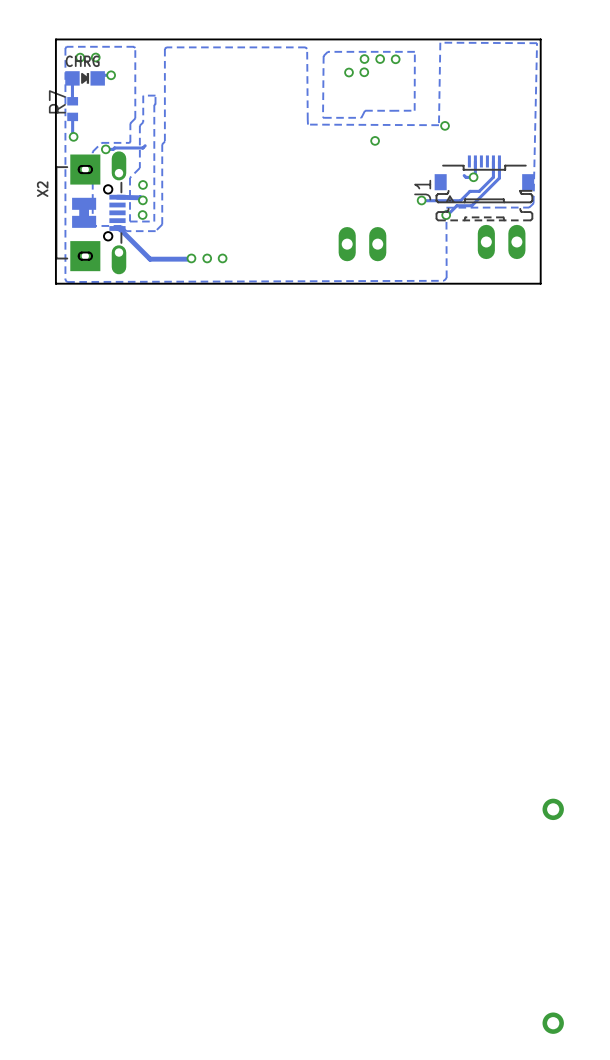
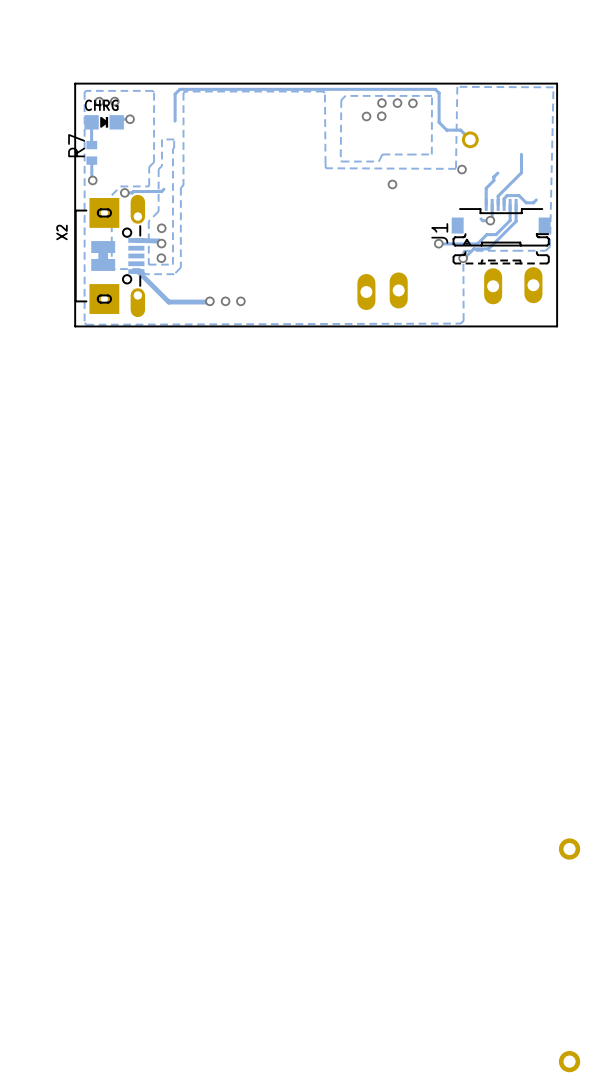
track: none -> (175, 121) (175, 94) (179, 89) (435, 89) (439, 93) (439, 122) (446, 130) (460, 130) (470, 139)
part: none -> (470, 139)
track: none -> (521, 154) (521, 172) (498, 196) (498, 204)
track: none -> (497, 173) (486, 188) (486, 204)
track: none -> (536, 199) (533, 202) (526, 202) (518, 195) (507, 195) (504, 198) (504, 204)
part: (501, 241) -> none
part: none -> (533, 285)
part: none -> (493, 286)
part: (362, 244) -> none
part: none -> (398, 290)
part: none -> (366, 292)

